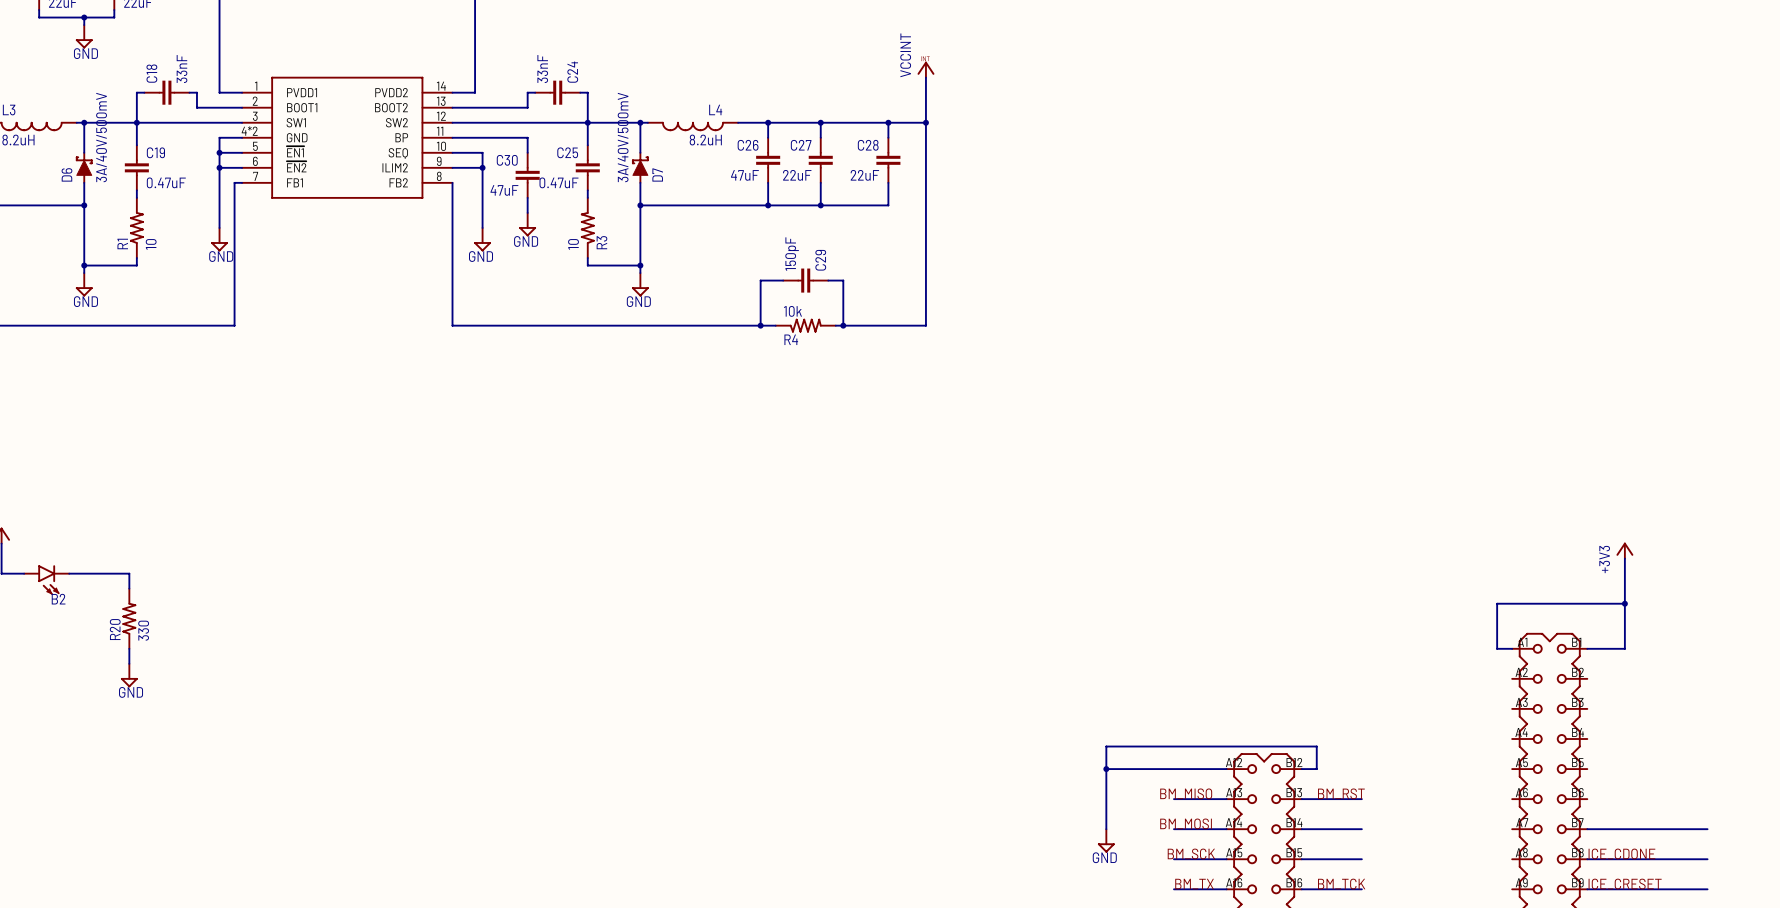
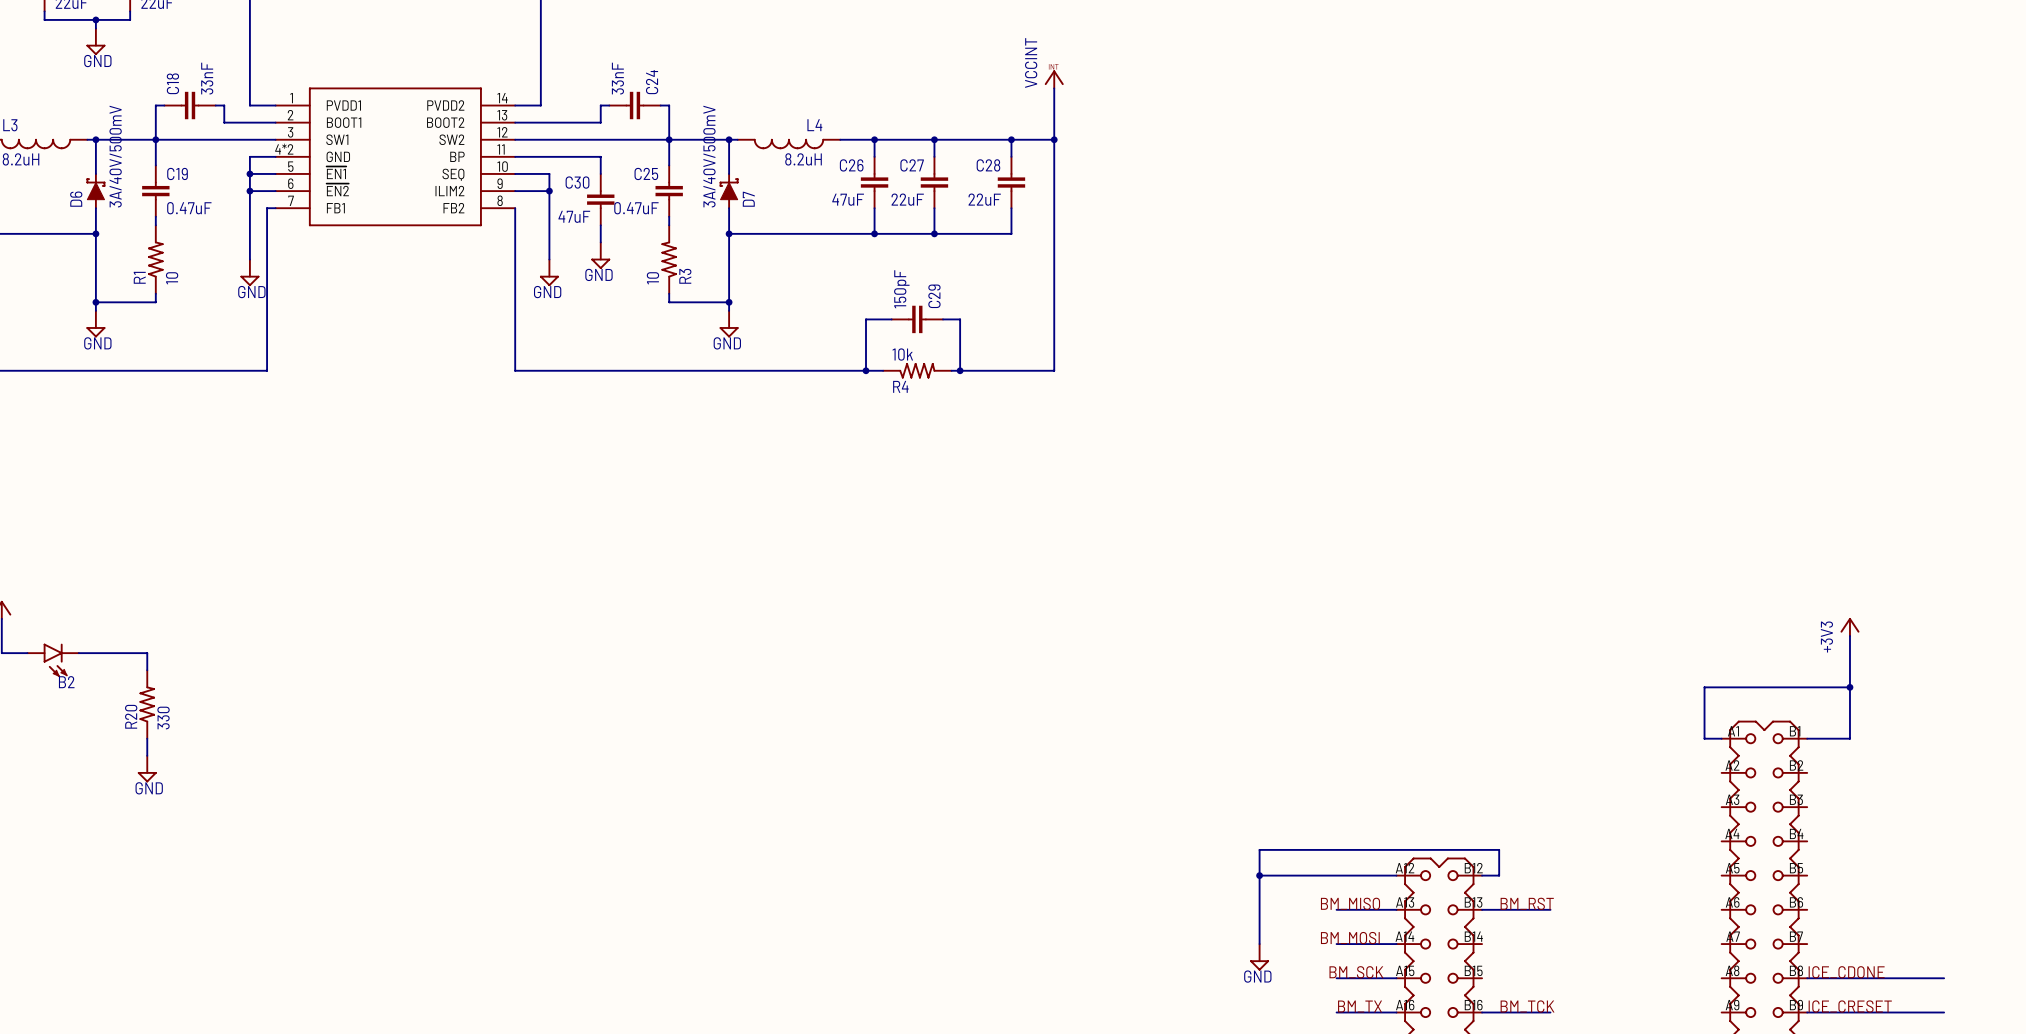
wire: (1301, 829) (1361, 829) -> none
wire: (1587, 829) (1707, 829) -> none
wire: (1301, 859) (1361, 859) -> none

